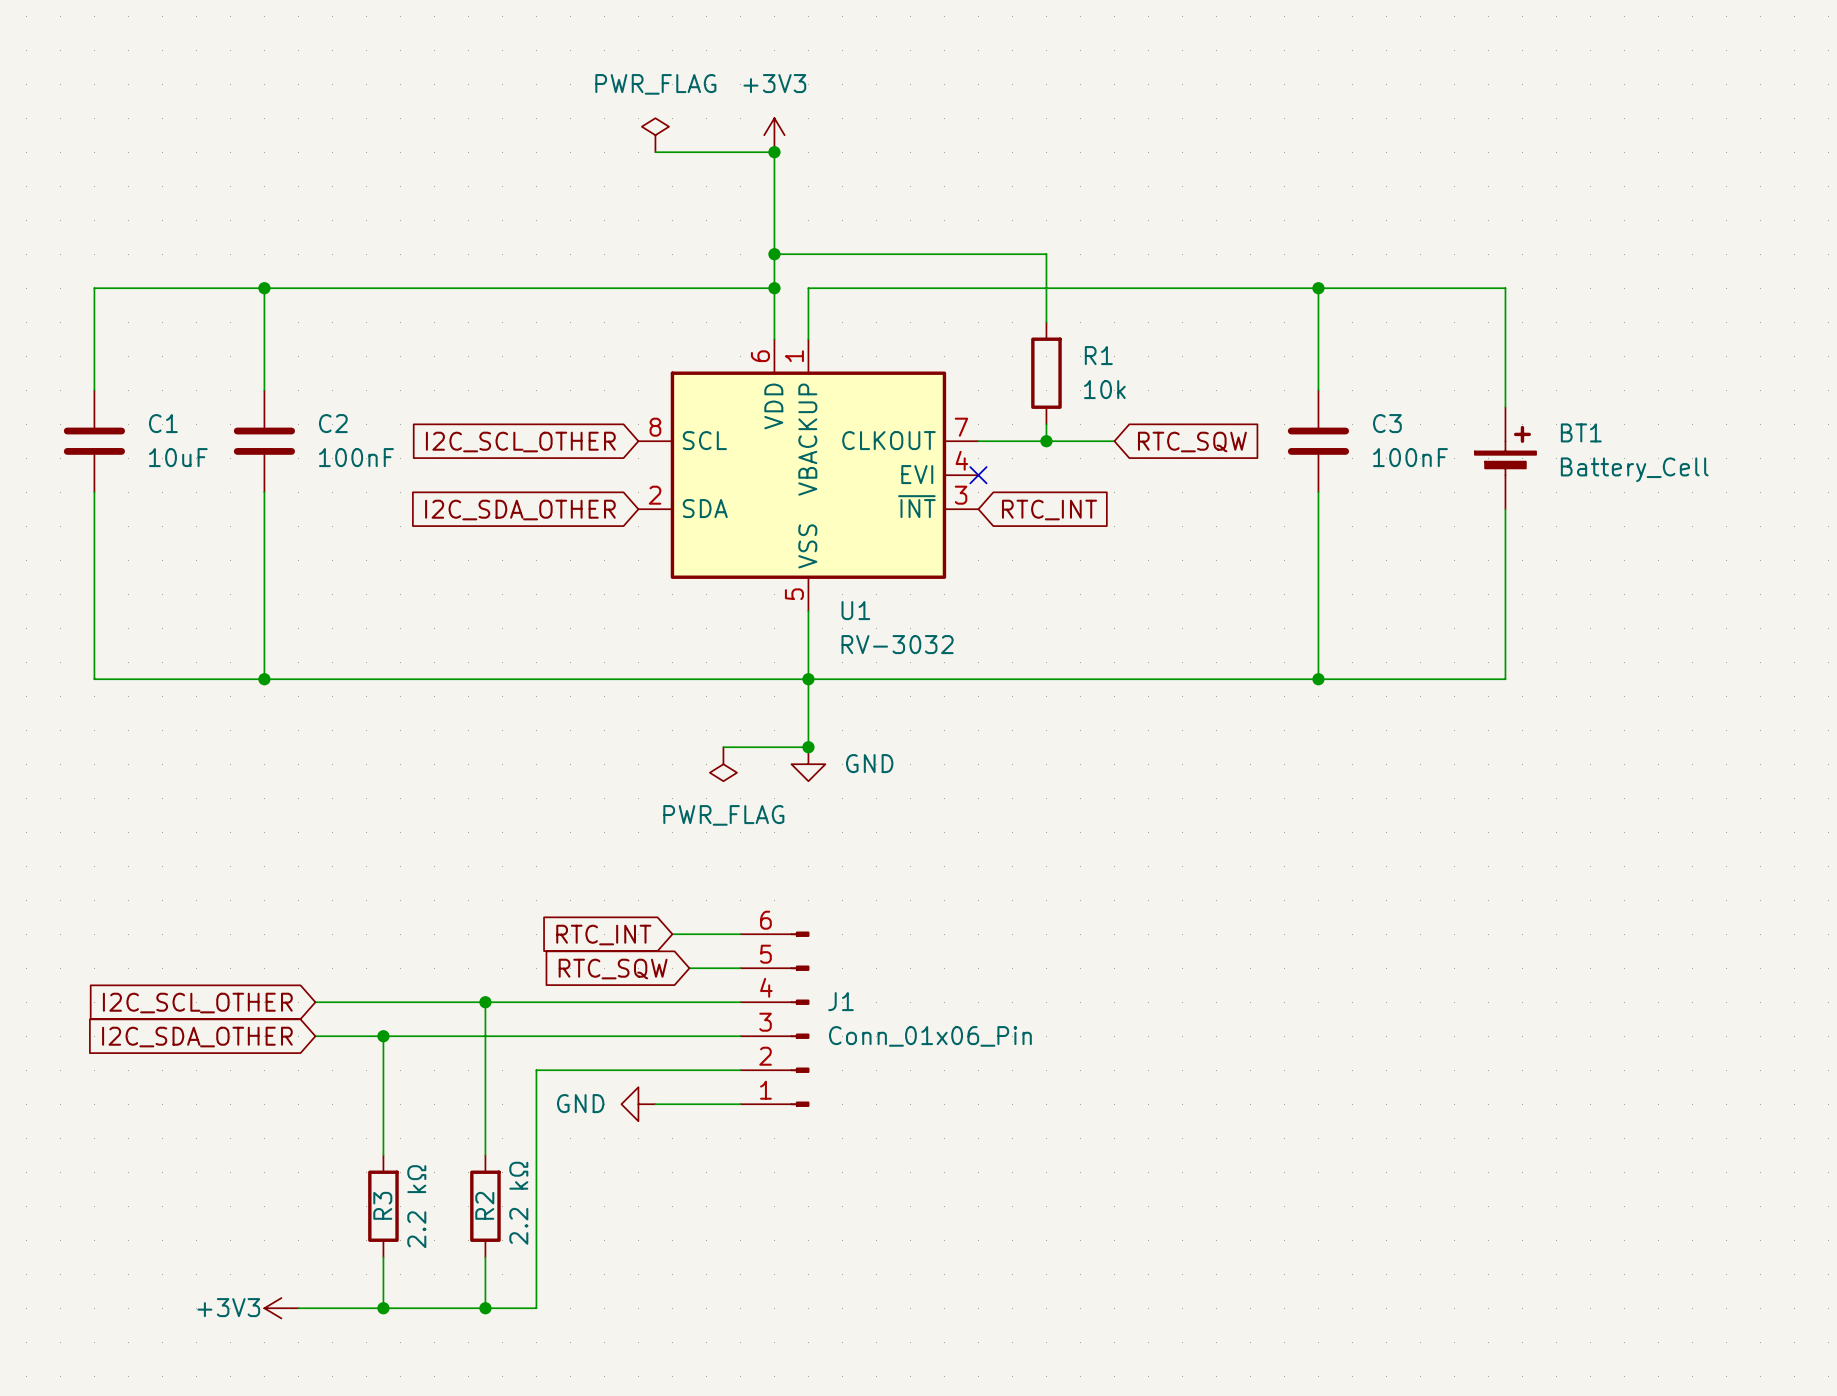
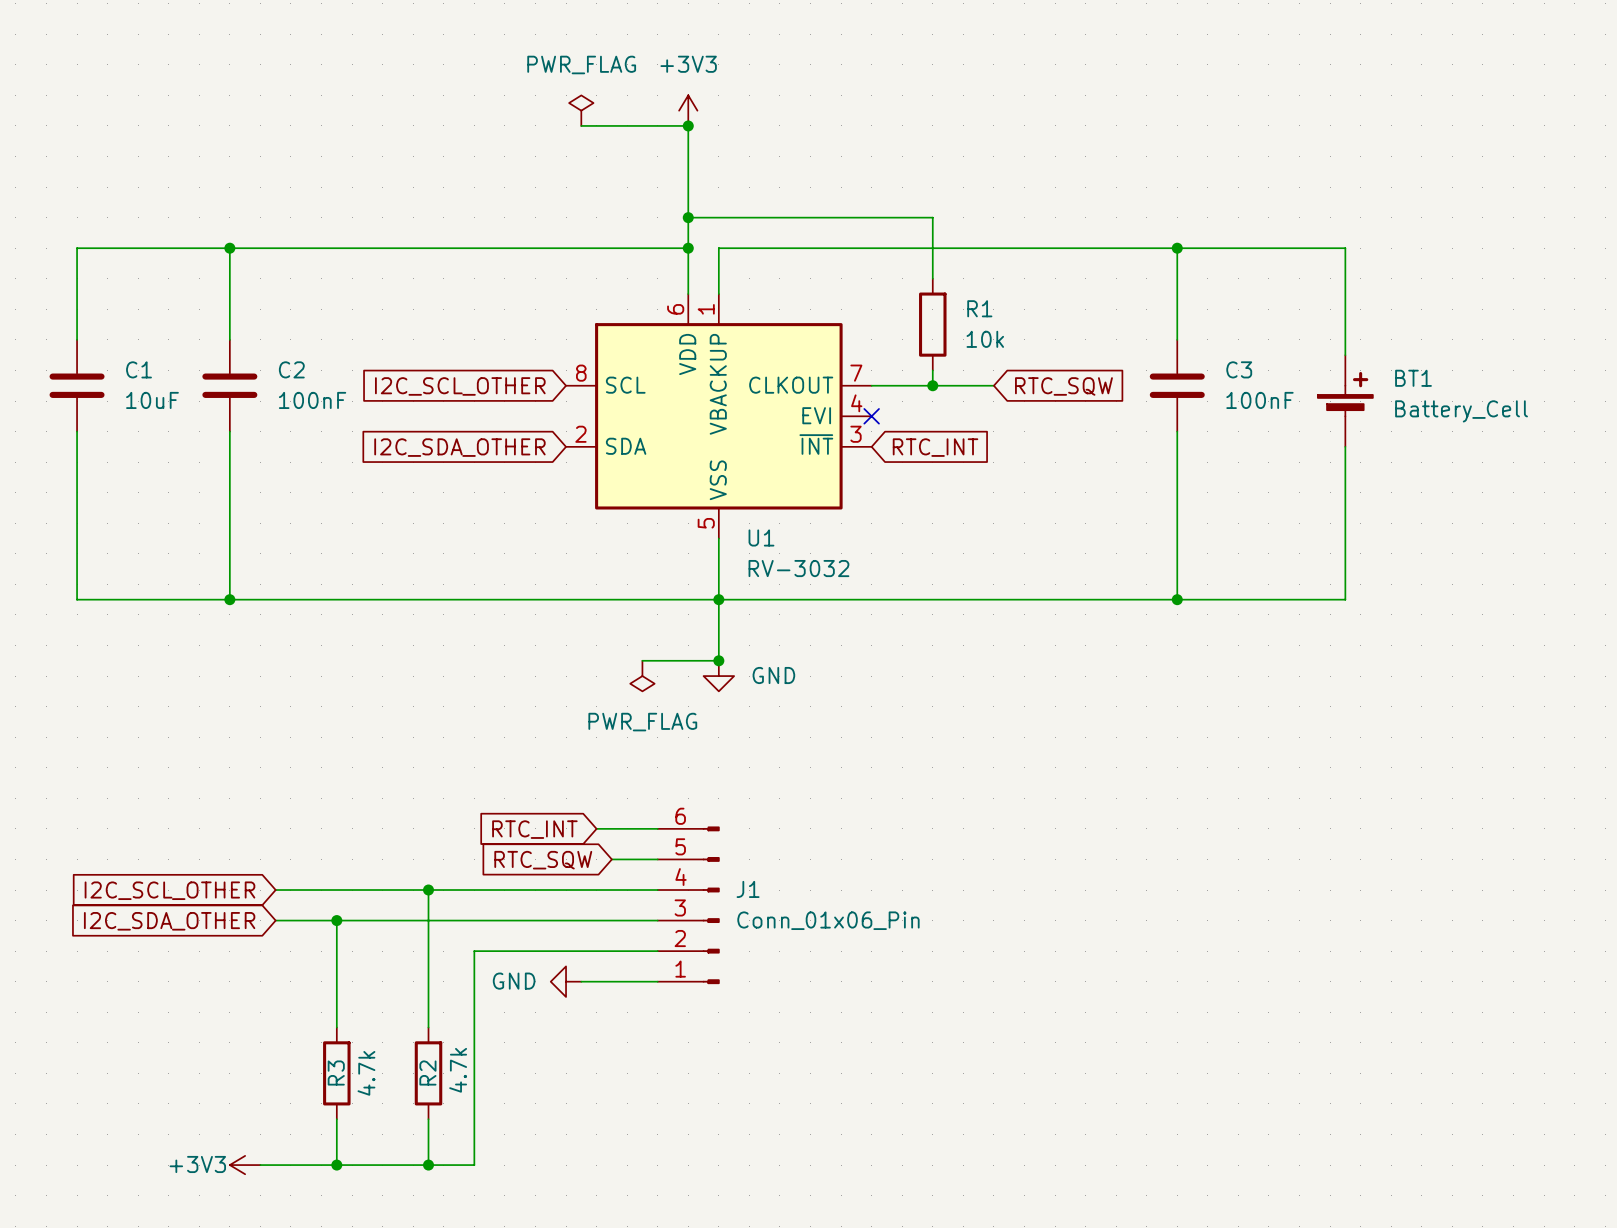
R2 value: 2.2 kΩ (518, 1203) -> 4.7k (458, 1070)
R3 value: 2.2 kΩ (416, 1206) -> 4.7k (366, 1073)

